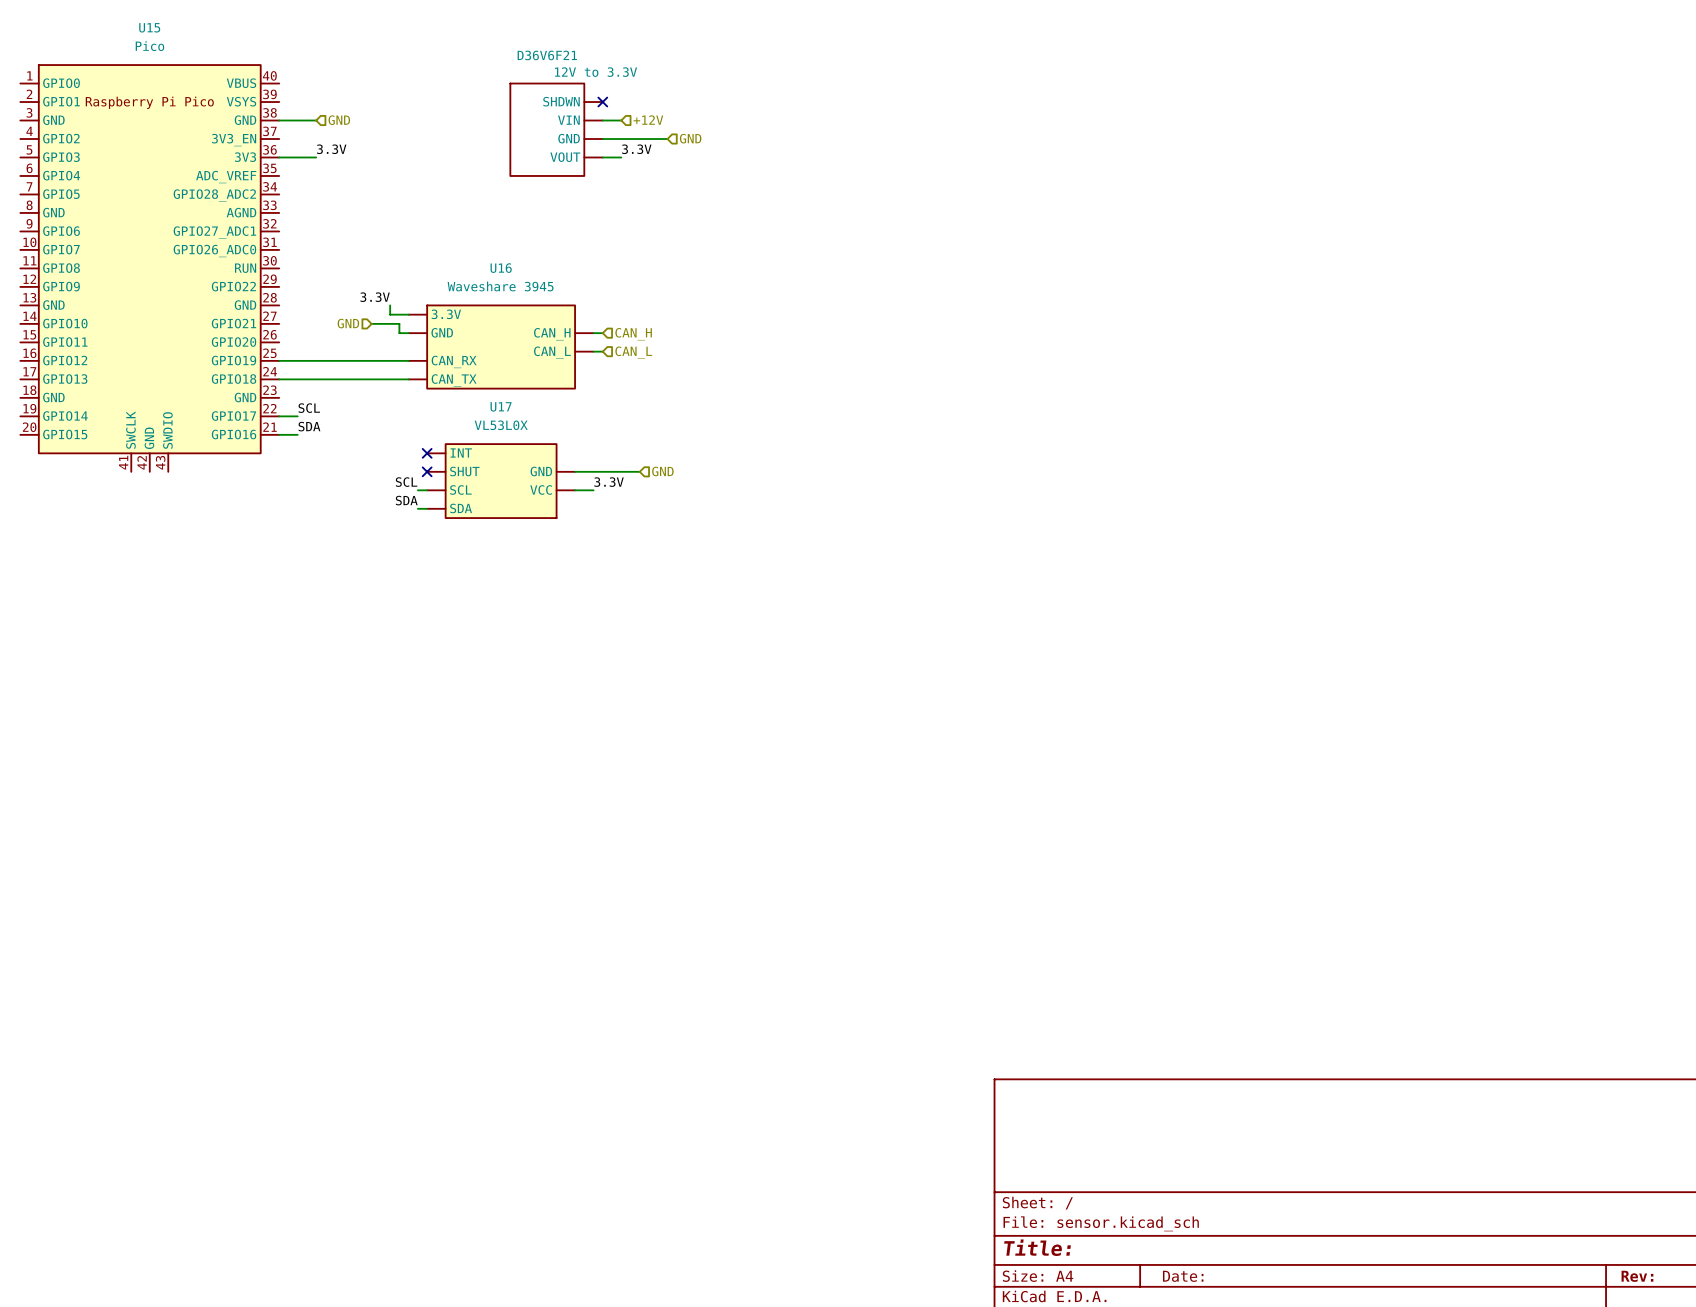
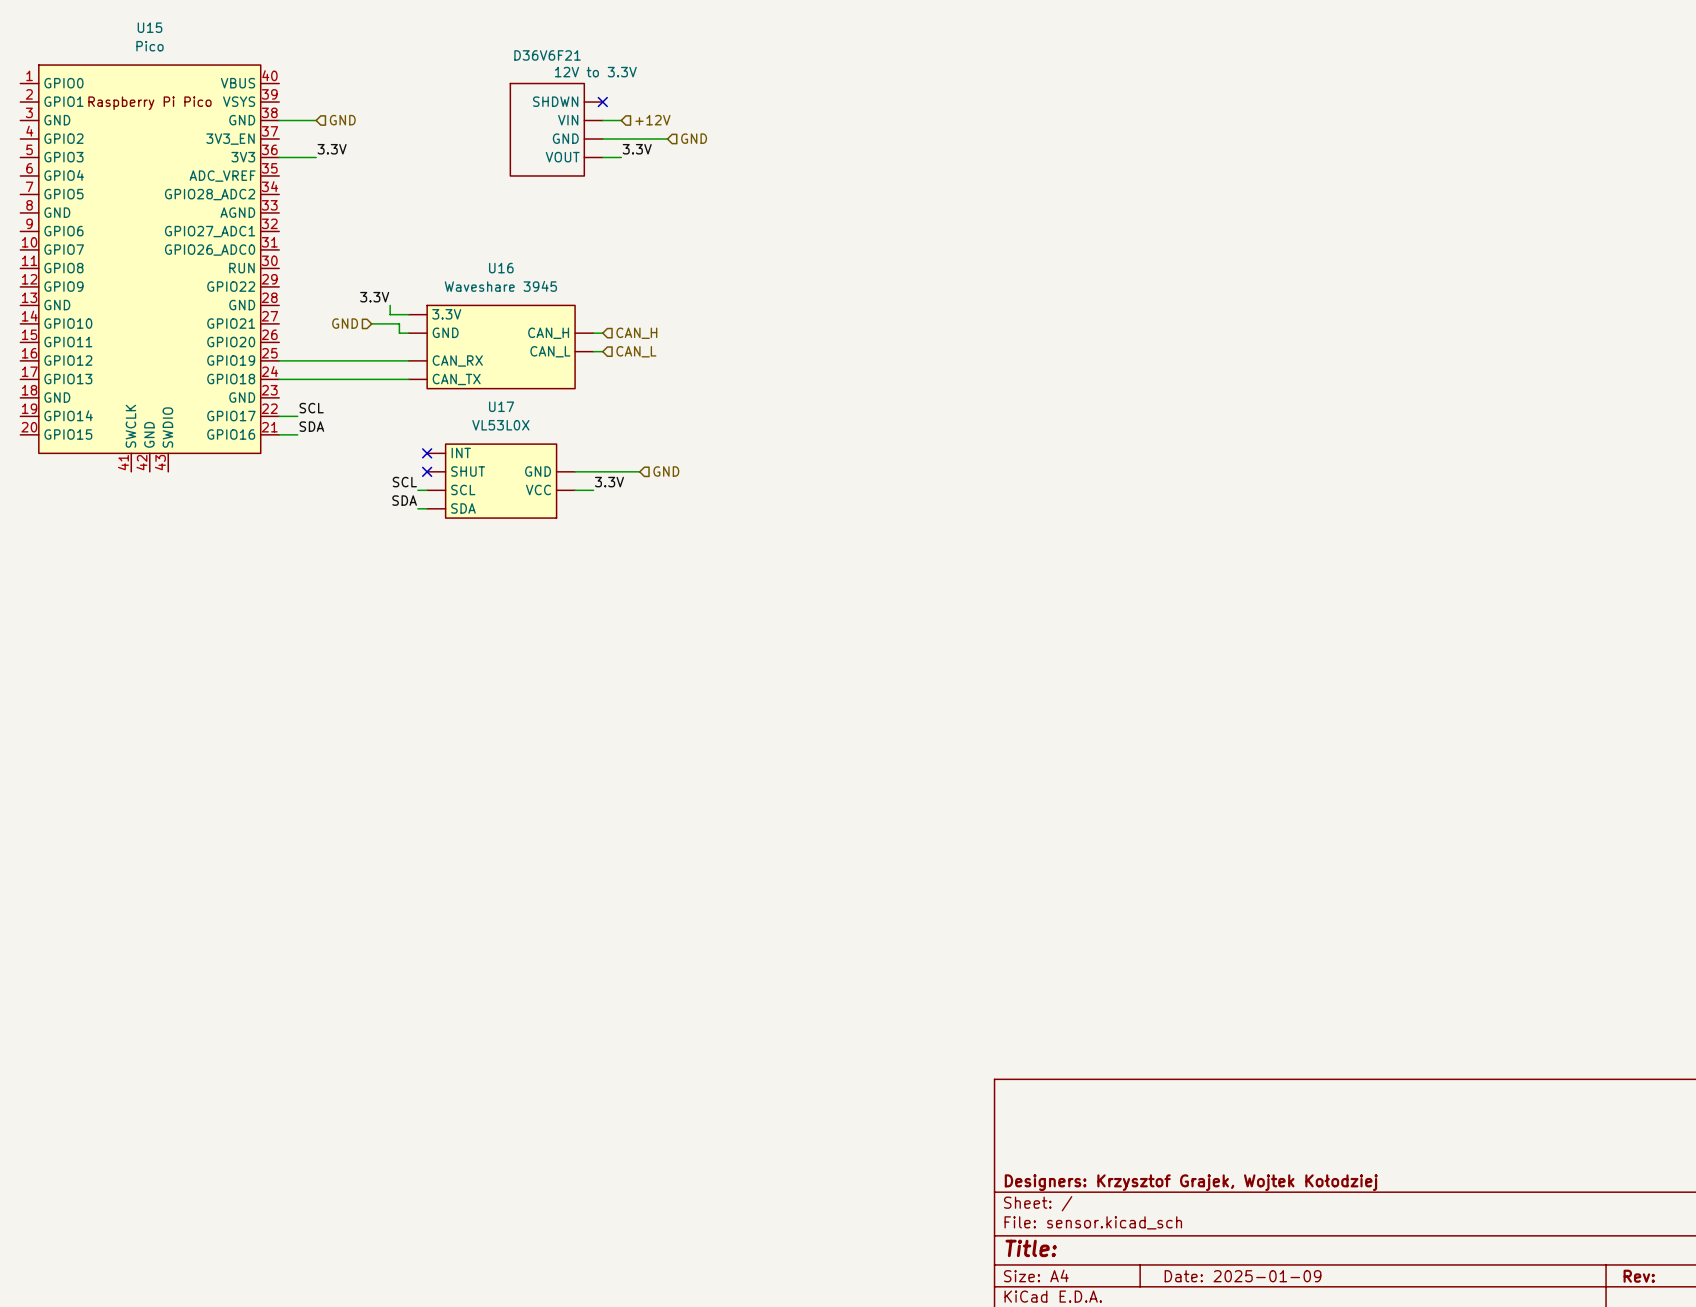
title block: none -> Designers: Krzysztof Grajek, Wojtek Kołodziej (1191, 1182)
title block: Date: (1183, 1276) -> Date: 2025-01-09 (1243, 1276)

